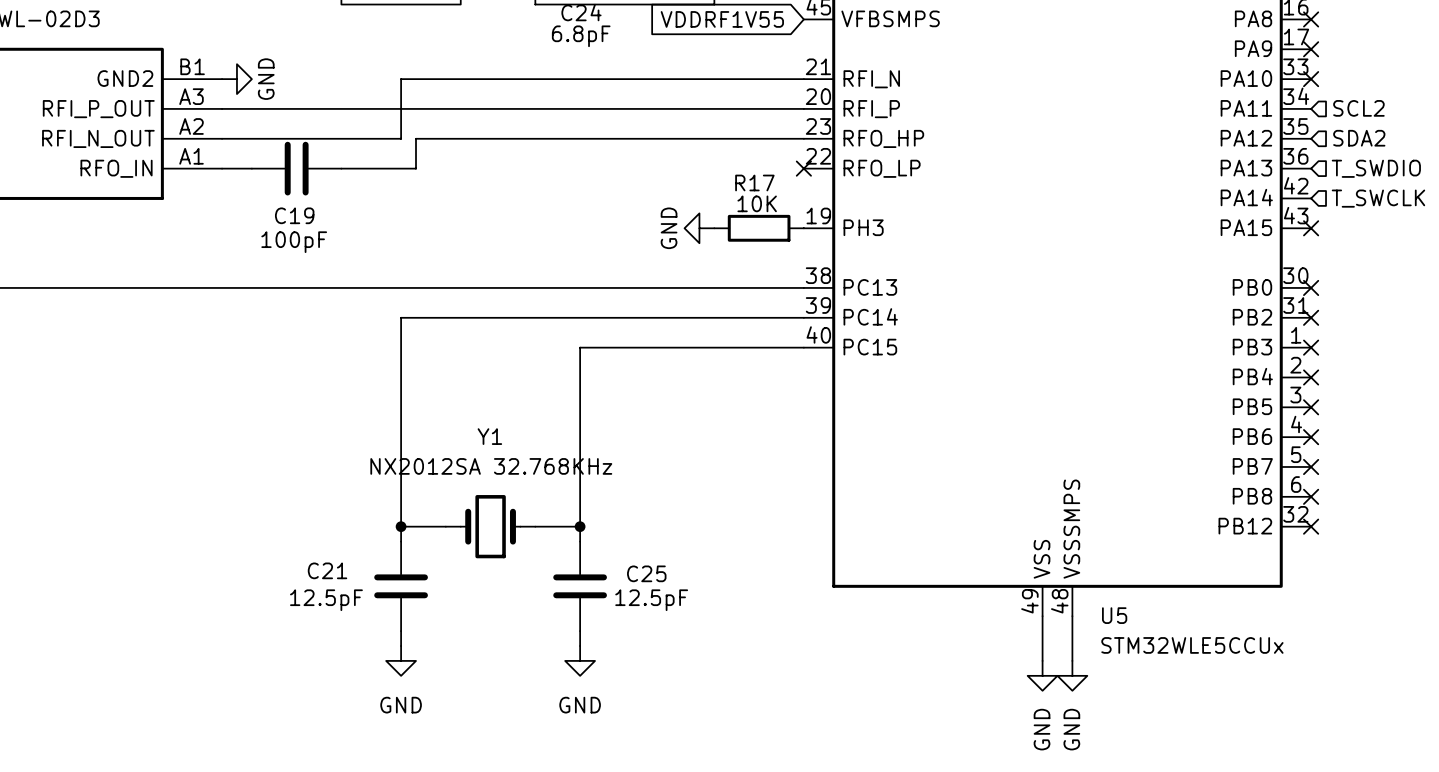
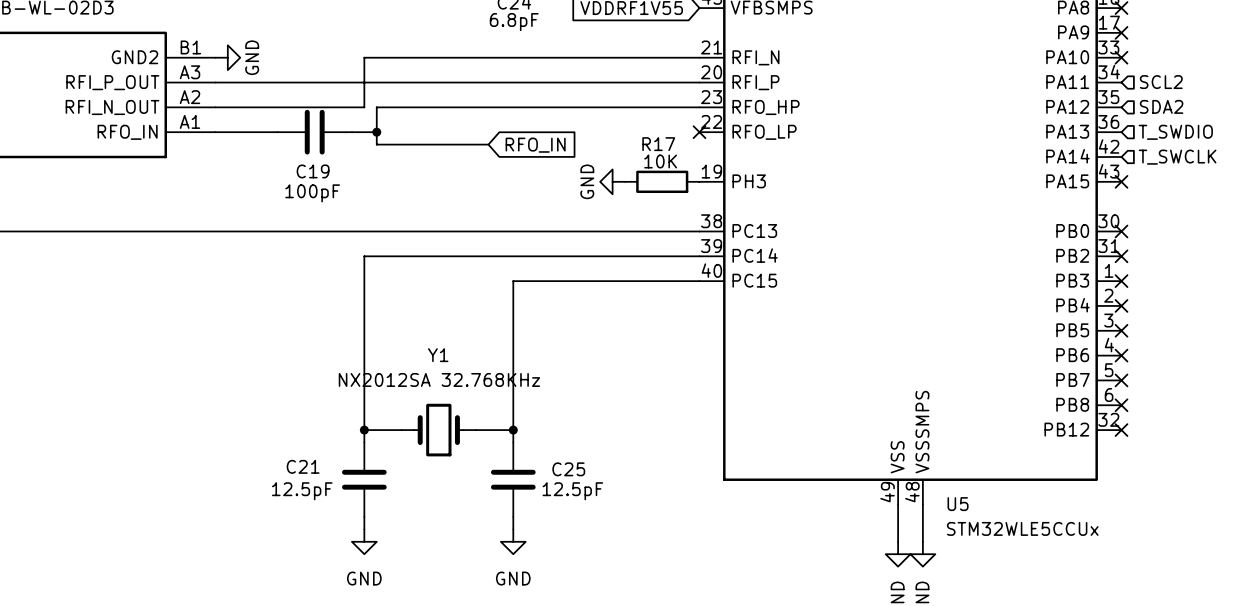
C19 position: (296, 168) -> (314, 132)
wire: none -> (376, 132) (376, 144) (488, 144)
junction: none -> (376, 132)
global label: none -> RFO_IN (535, 145)

